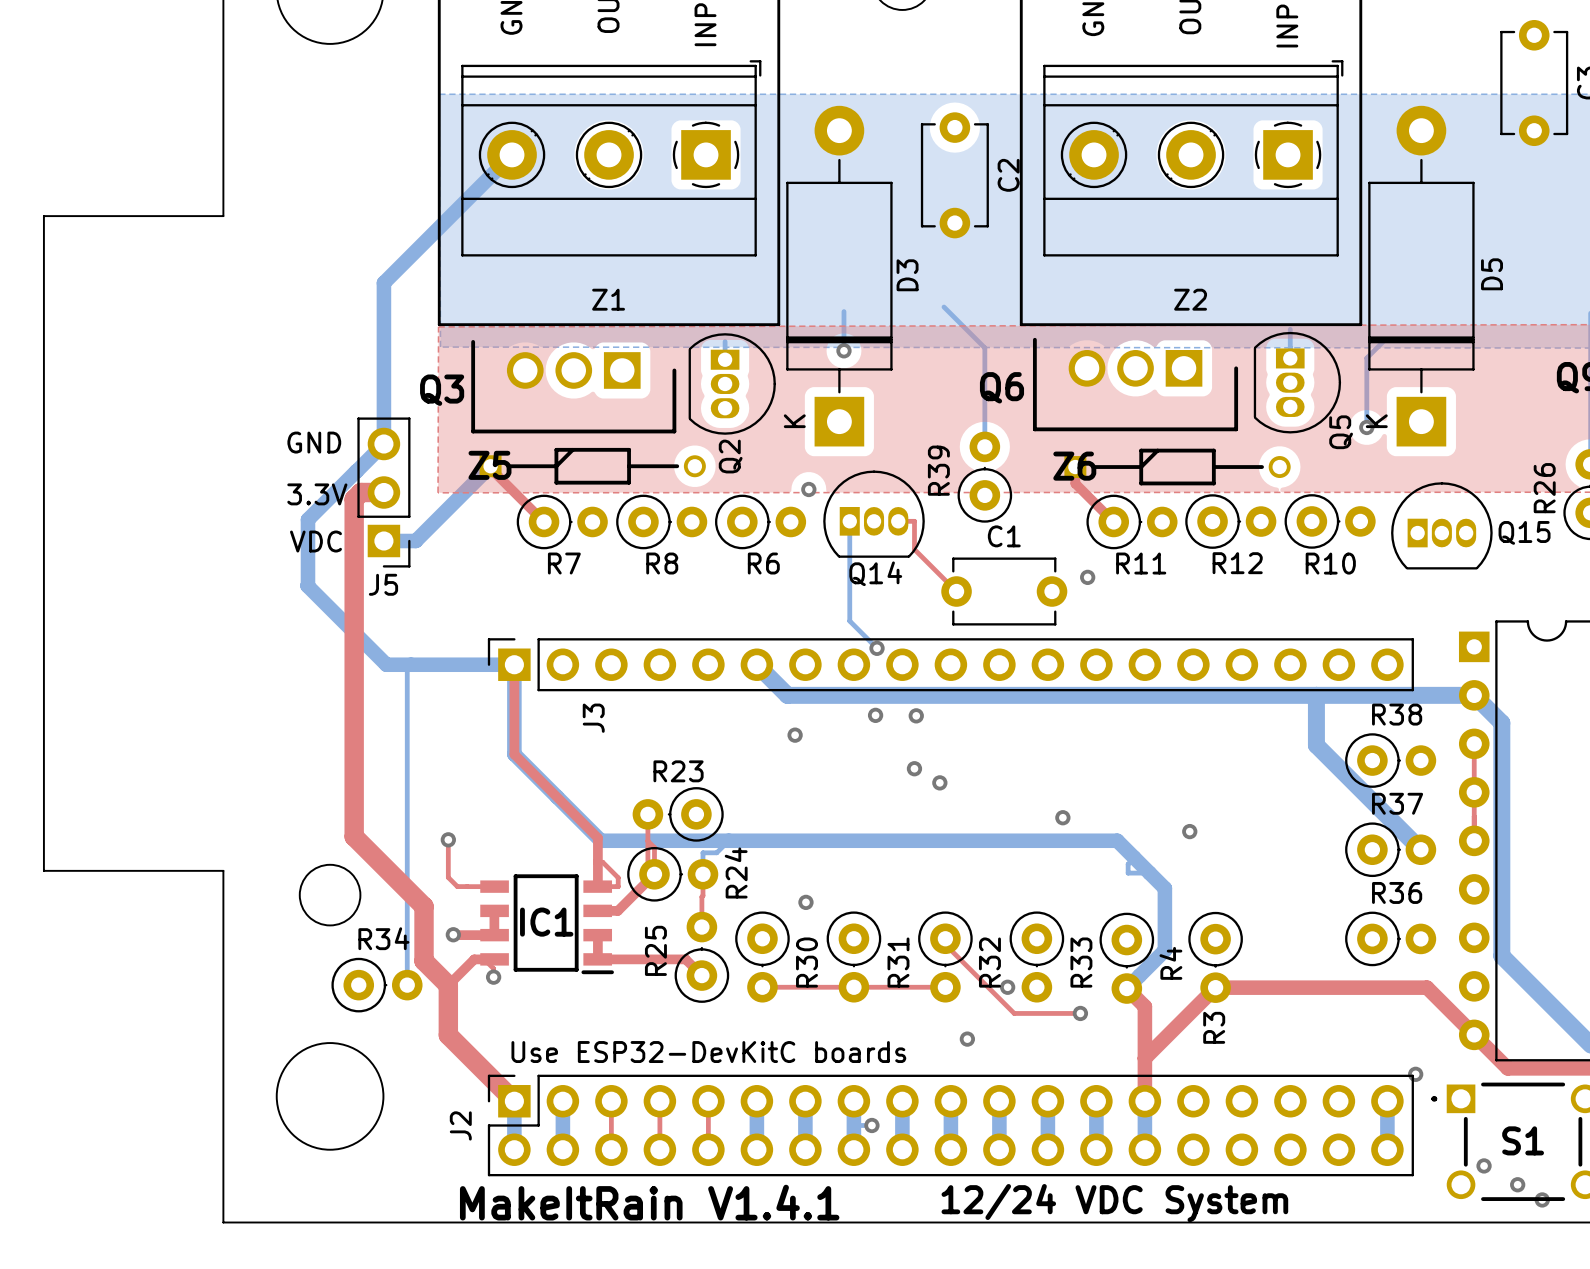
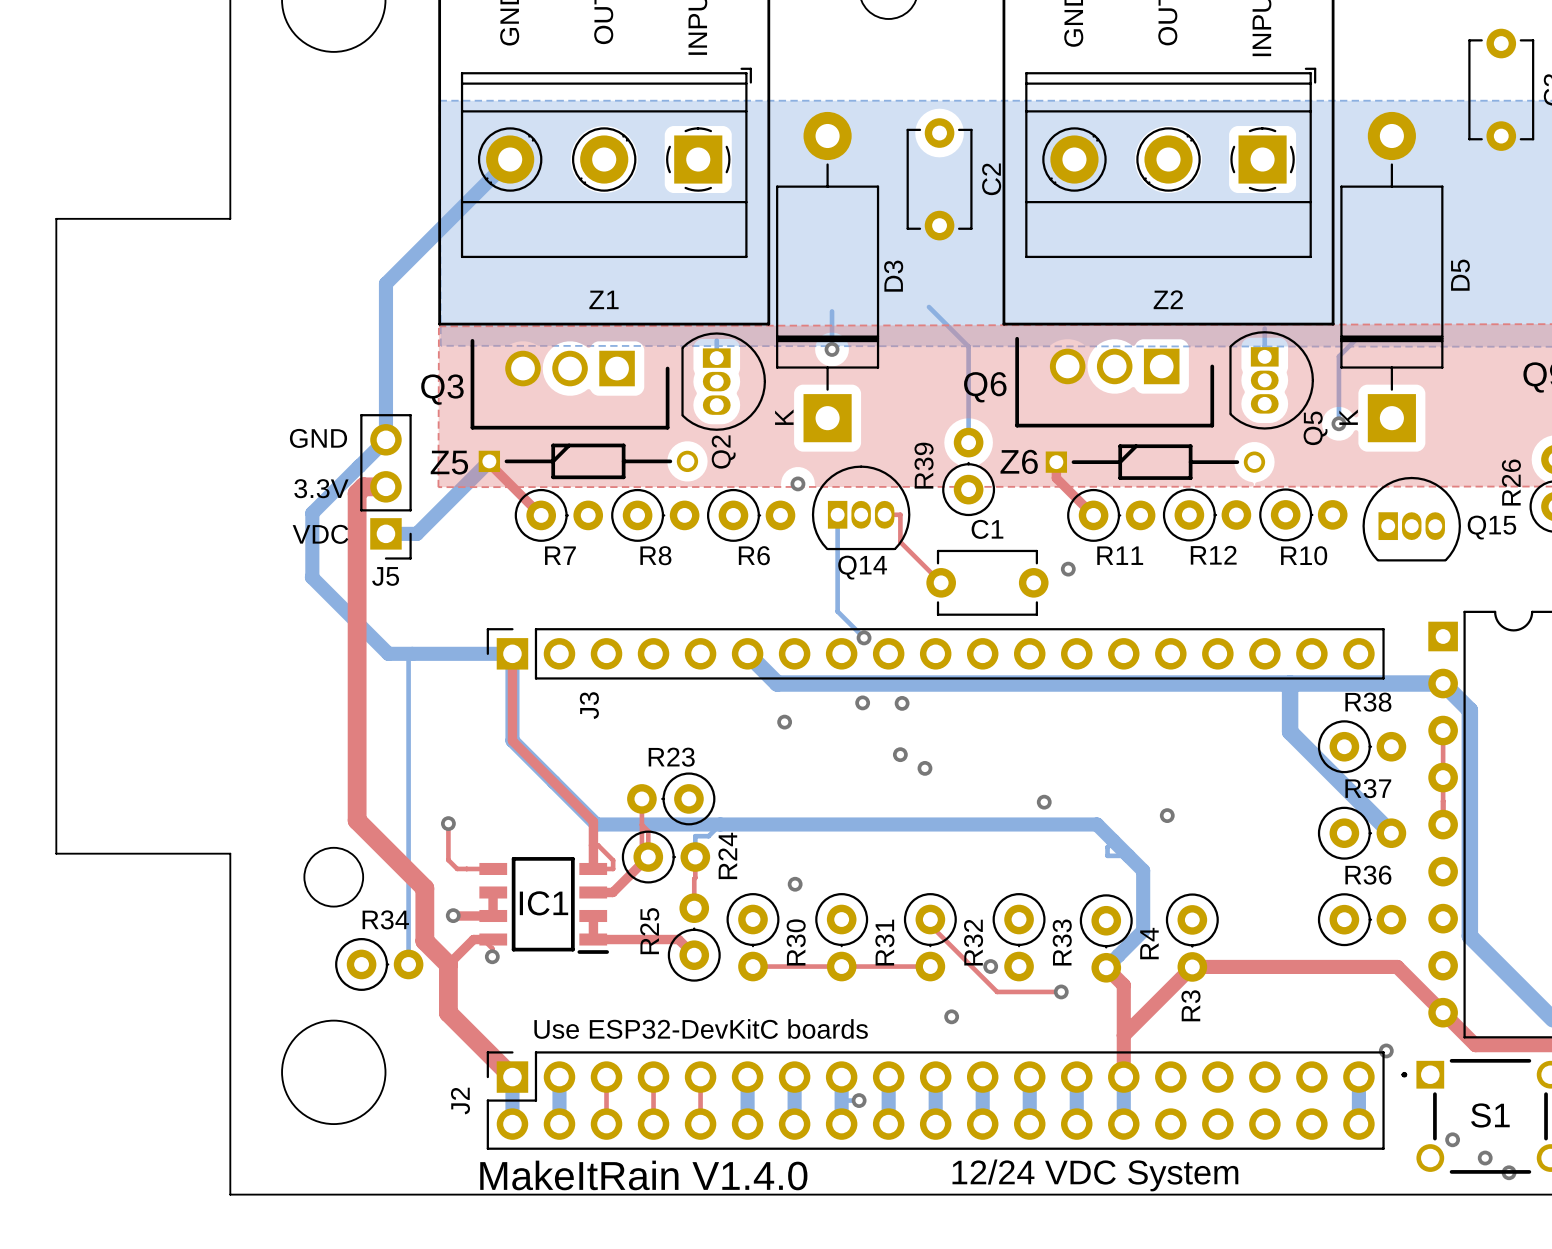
Z5 name position: Z5 (489, 465) -> Z5 (449, 462)
Z6 name position: Z6 (1074, 466) -> Z6 (1019, 461)
text: MakeItRain V1.4.1 (649, 1202) -> MakeItRain V1.4.0 (643, 1175)

